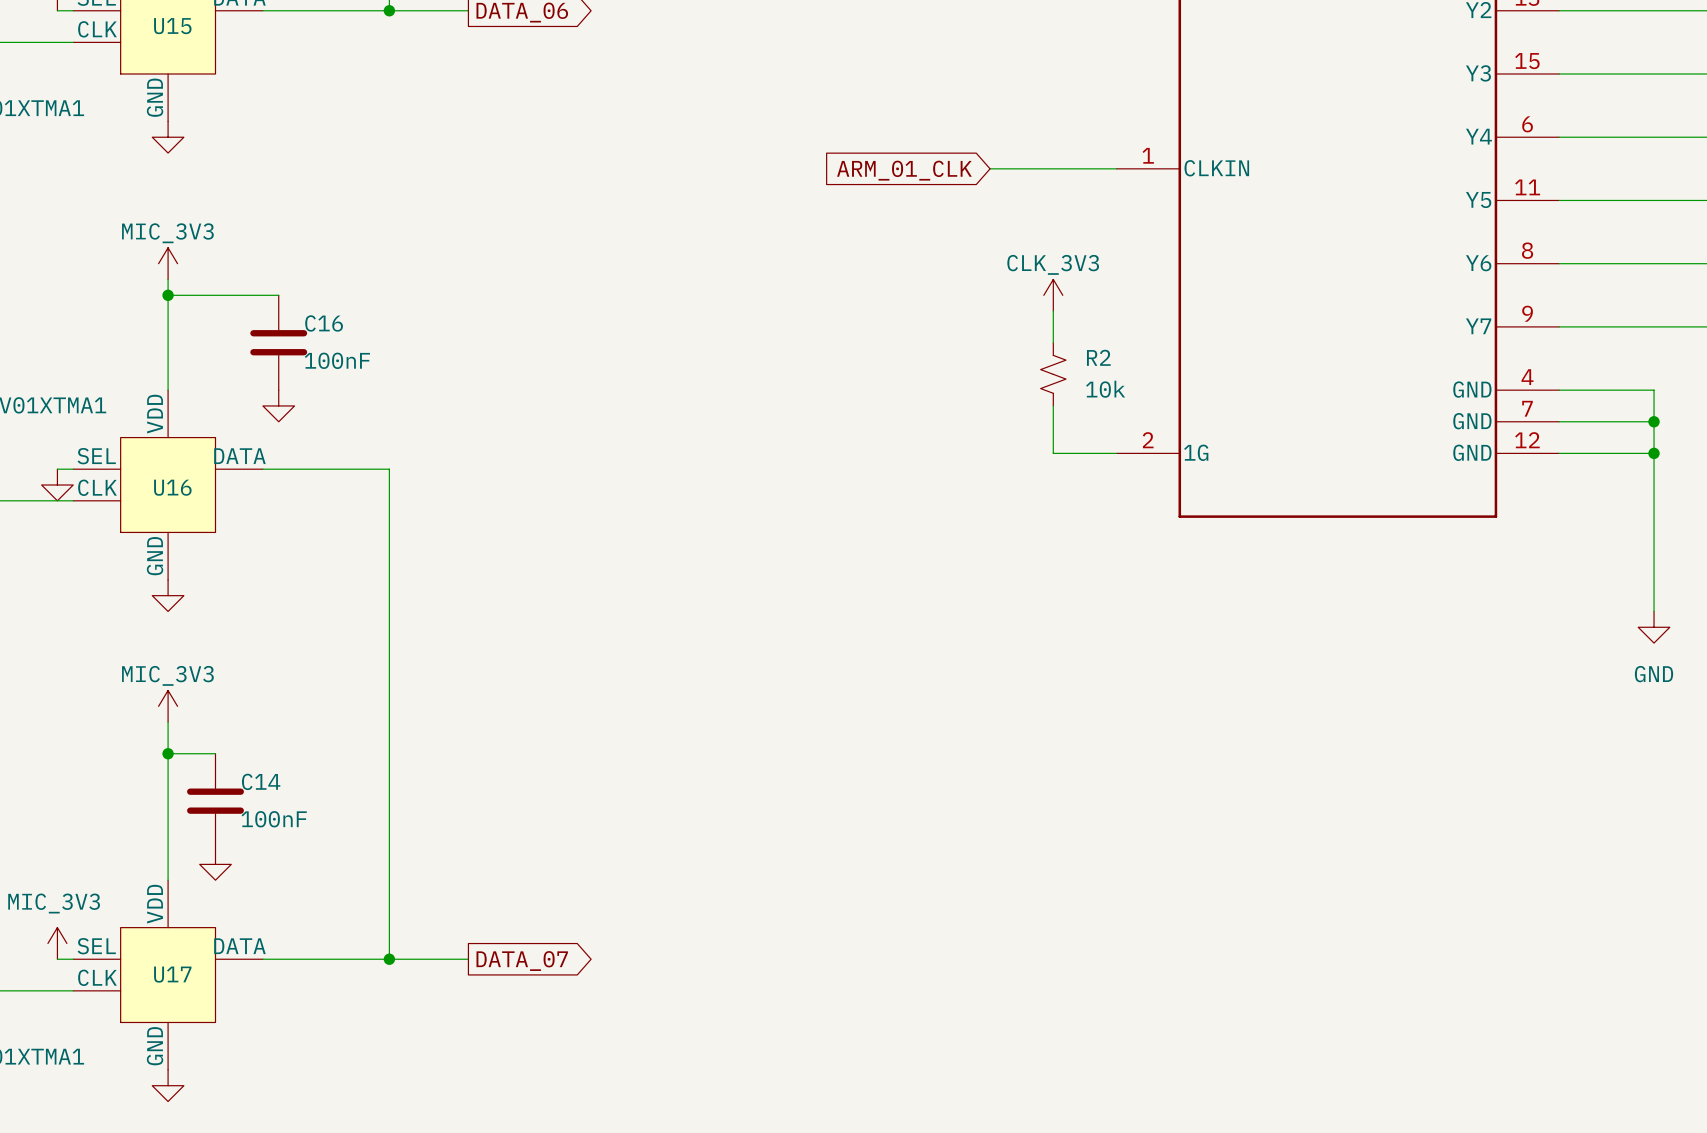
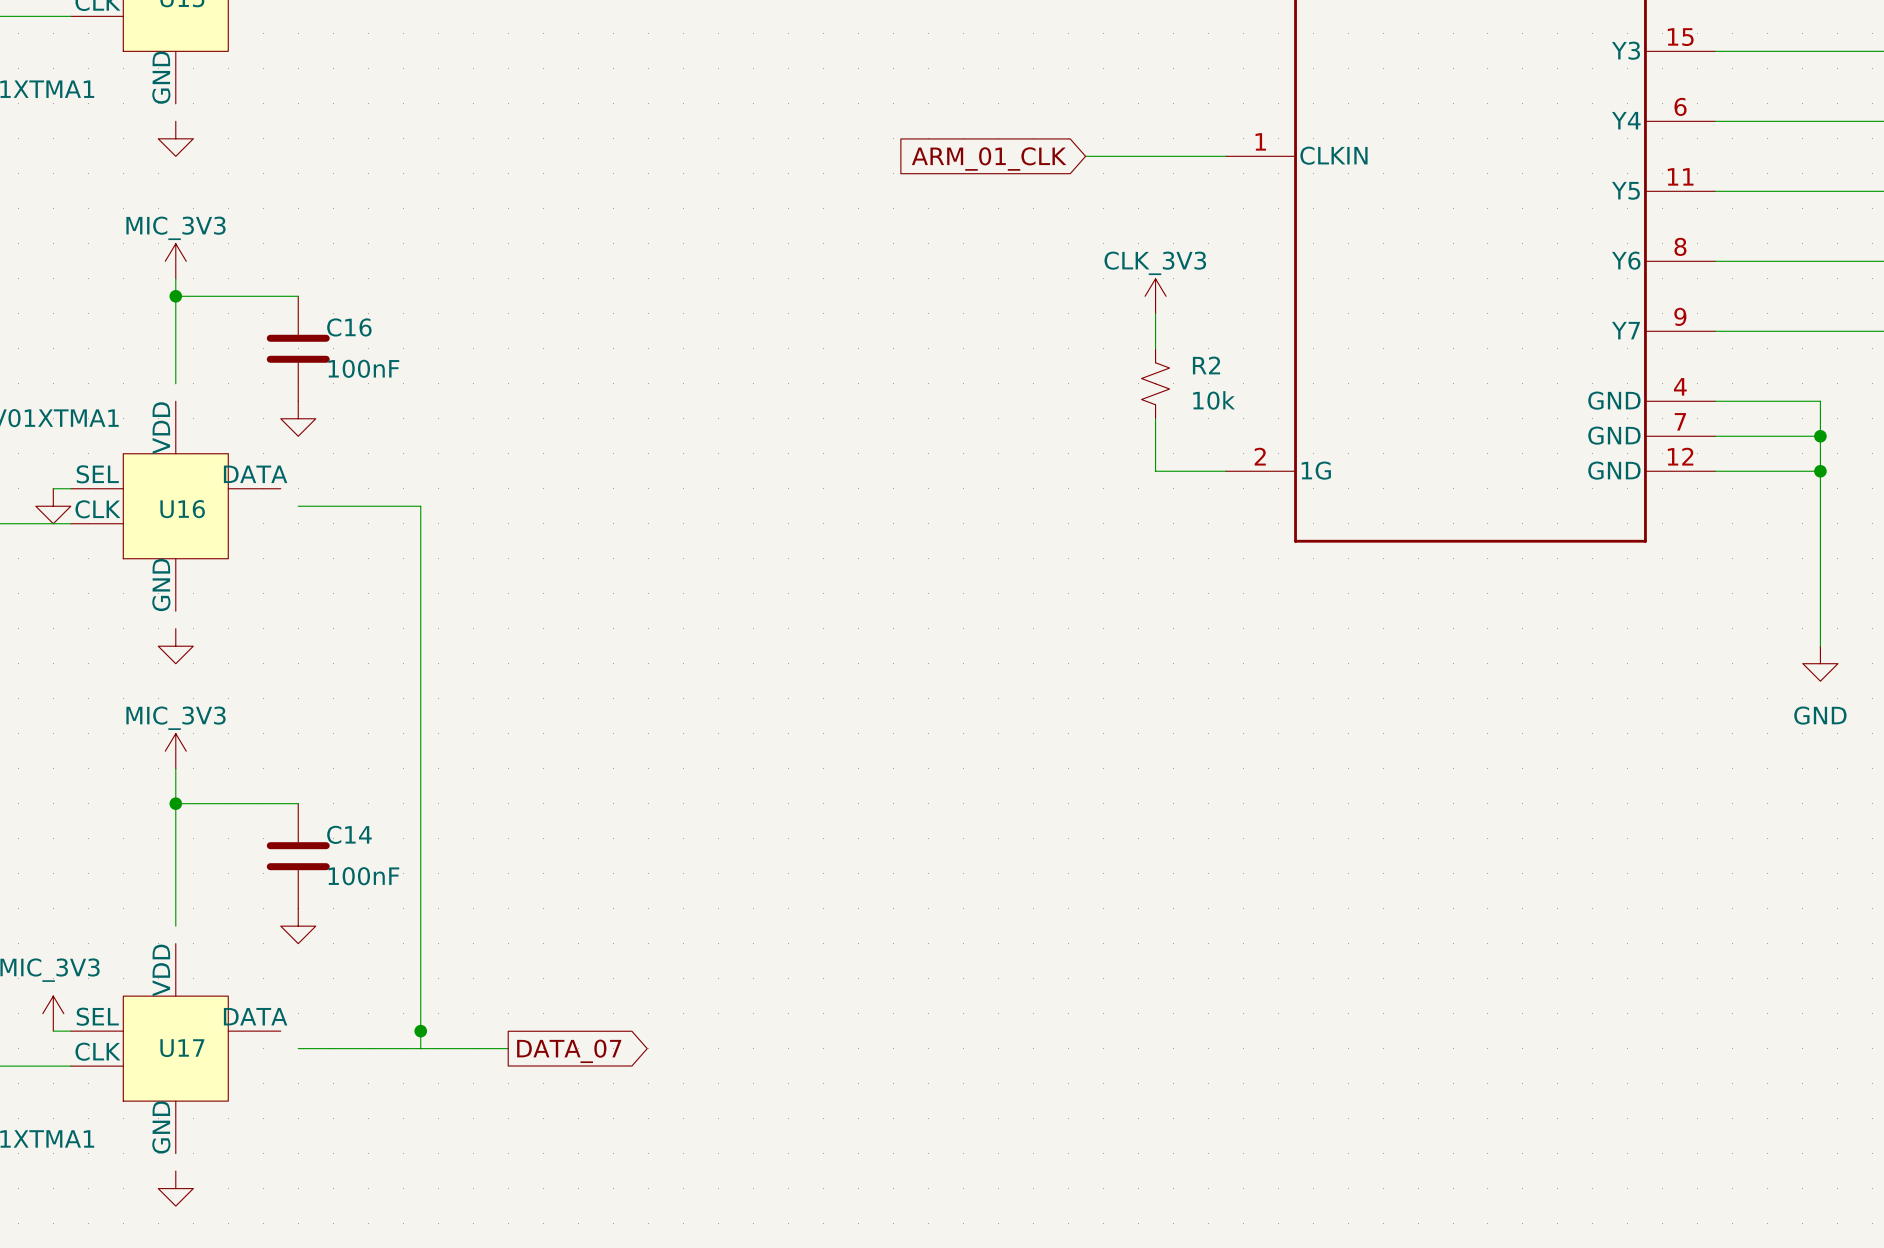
power symbol position: (168, 137) -> (175, 138)
wire: (168, 374) (168, 390) -> none
wire: (262, 469) (389, 469) (389, 485) -> (298, 506) (420, 506)
power symbol position: (168, 595) -> (175, 646)
wire: none -> (228, 803) (298, 803)
C14 position: (215, 801) -> (298, 856)
wire: (168, 864) (168, 880) -> (420, 1031) (420, 1048)
power symbol position: (215, 864) -> (298, 926)
wire: (262, 959) (468, 959) -> none
global label position: DATA_07 (522, 961) -> DATA_07 (569, 1051)
wire: none -> (298, 1048) (508, 1048)
power symbol position: (168, 1085) -> (175, 1188)

